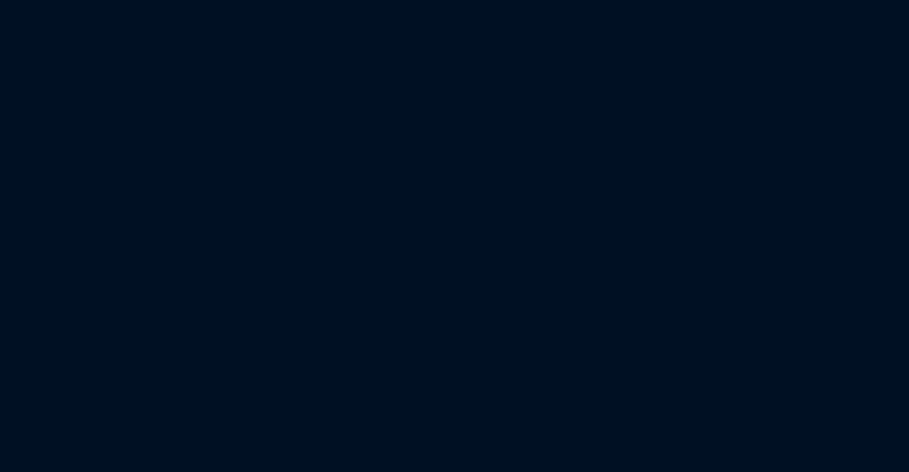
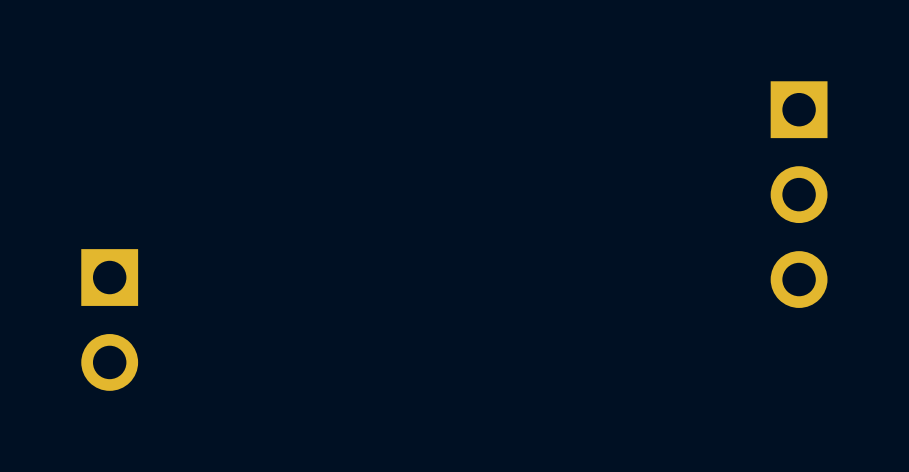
part: none -> (799, 194)
part: none -> (109, 319)

